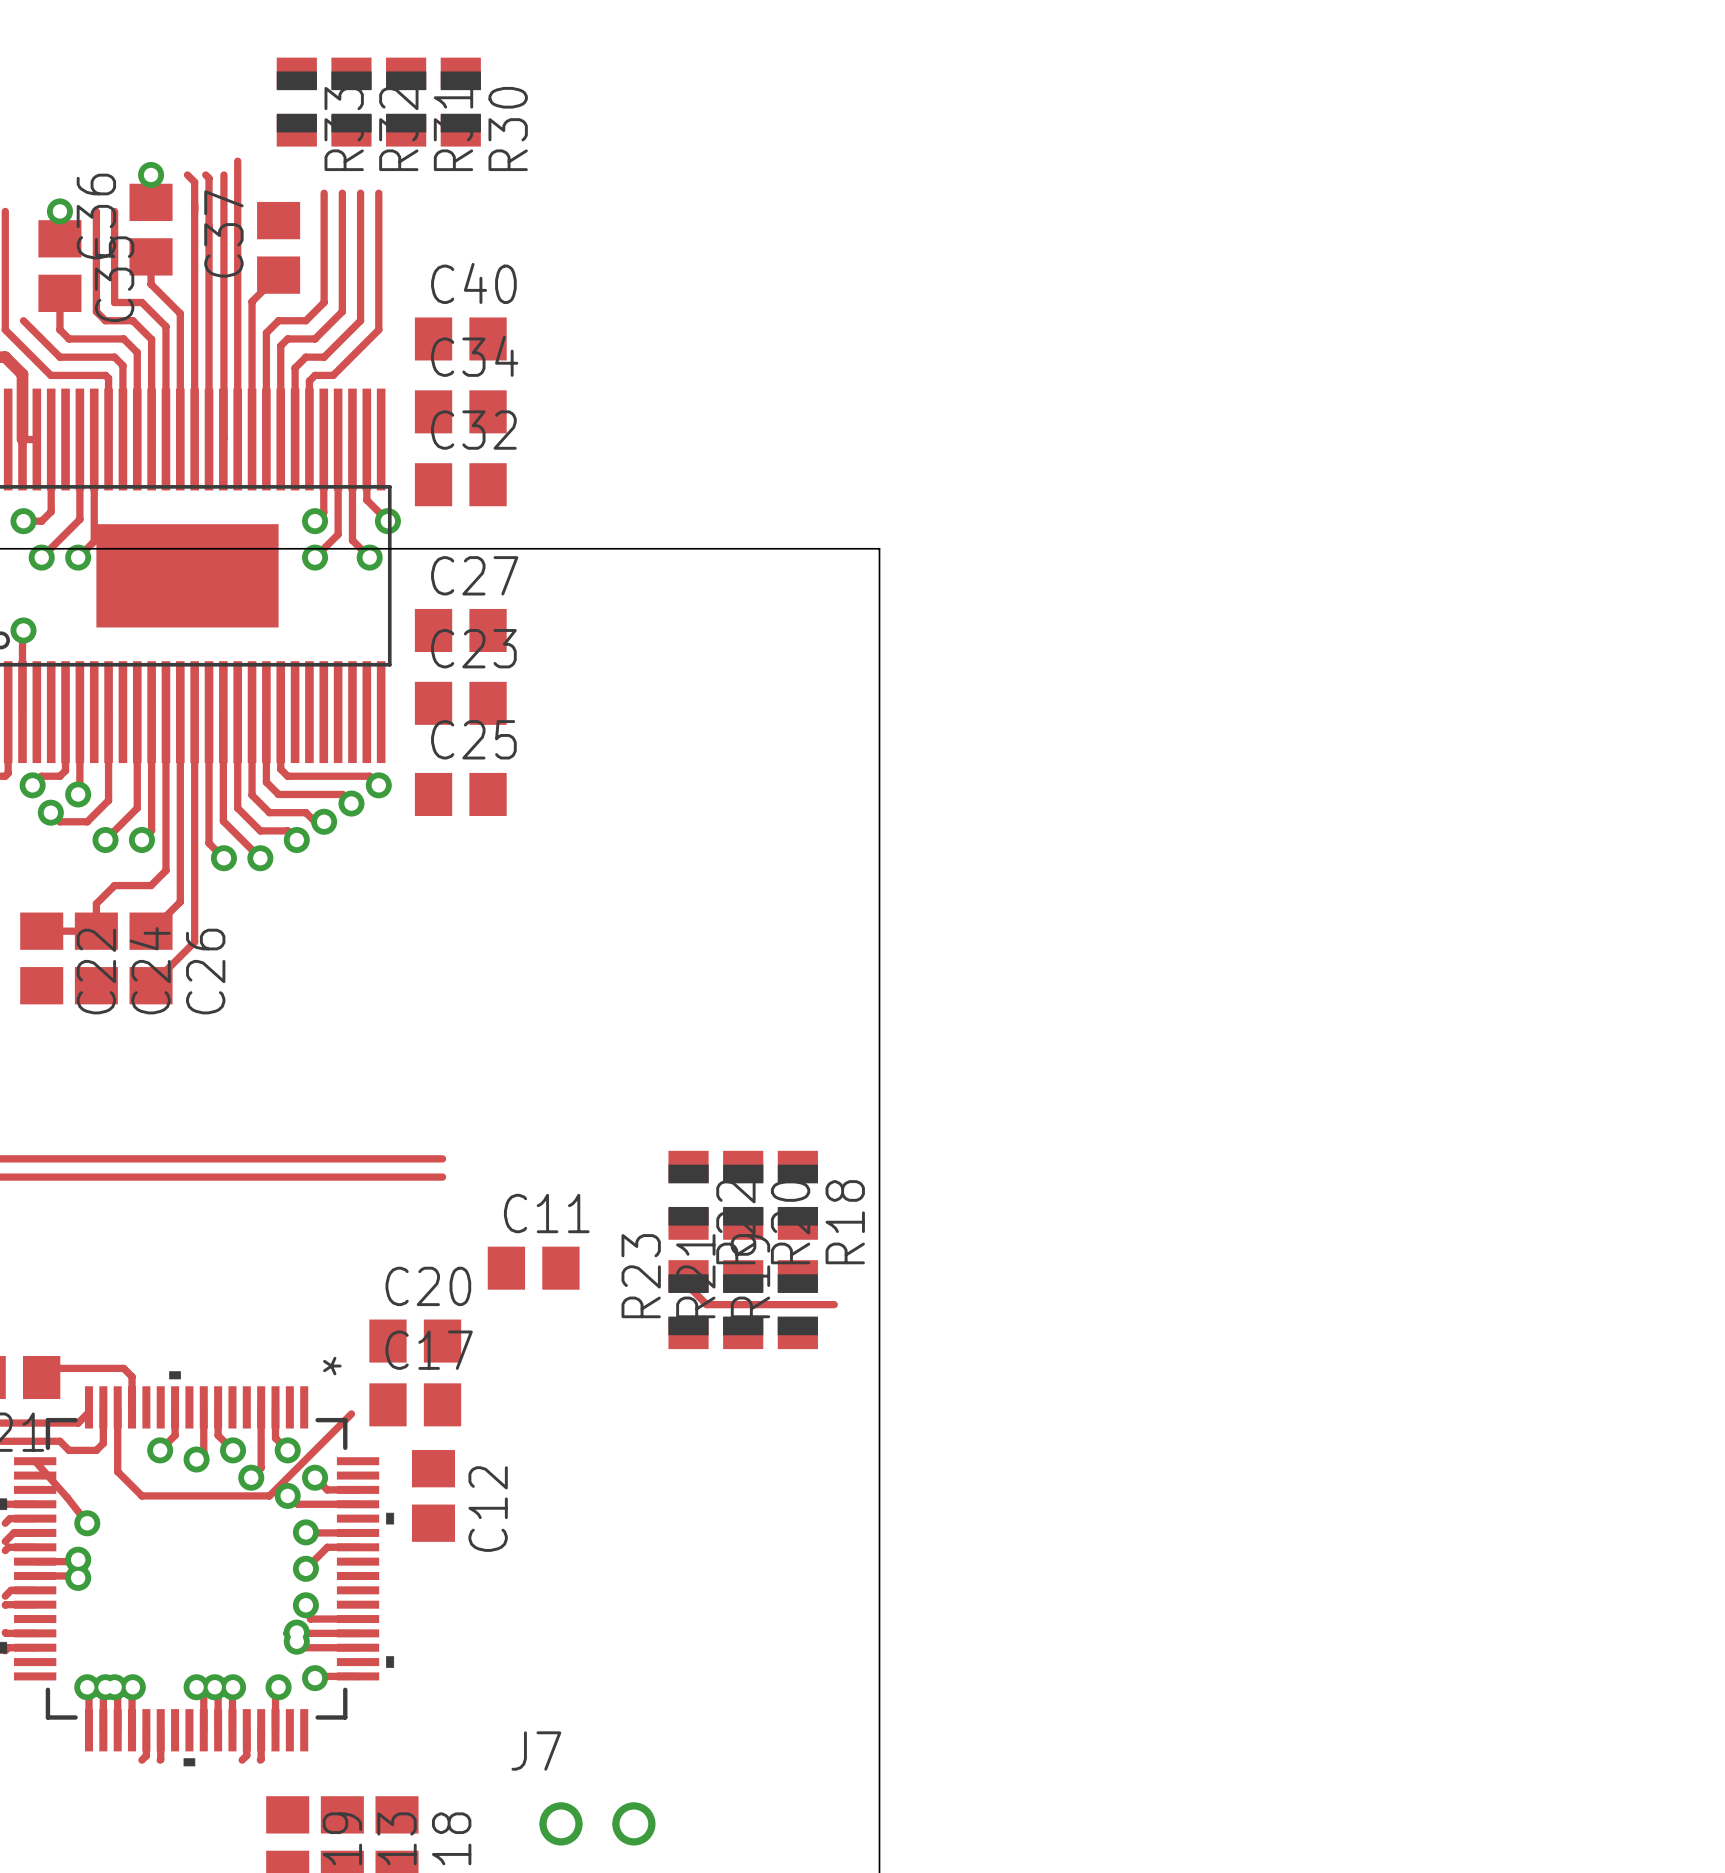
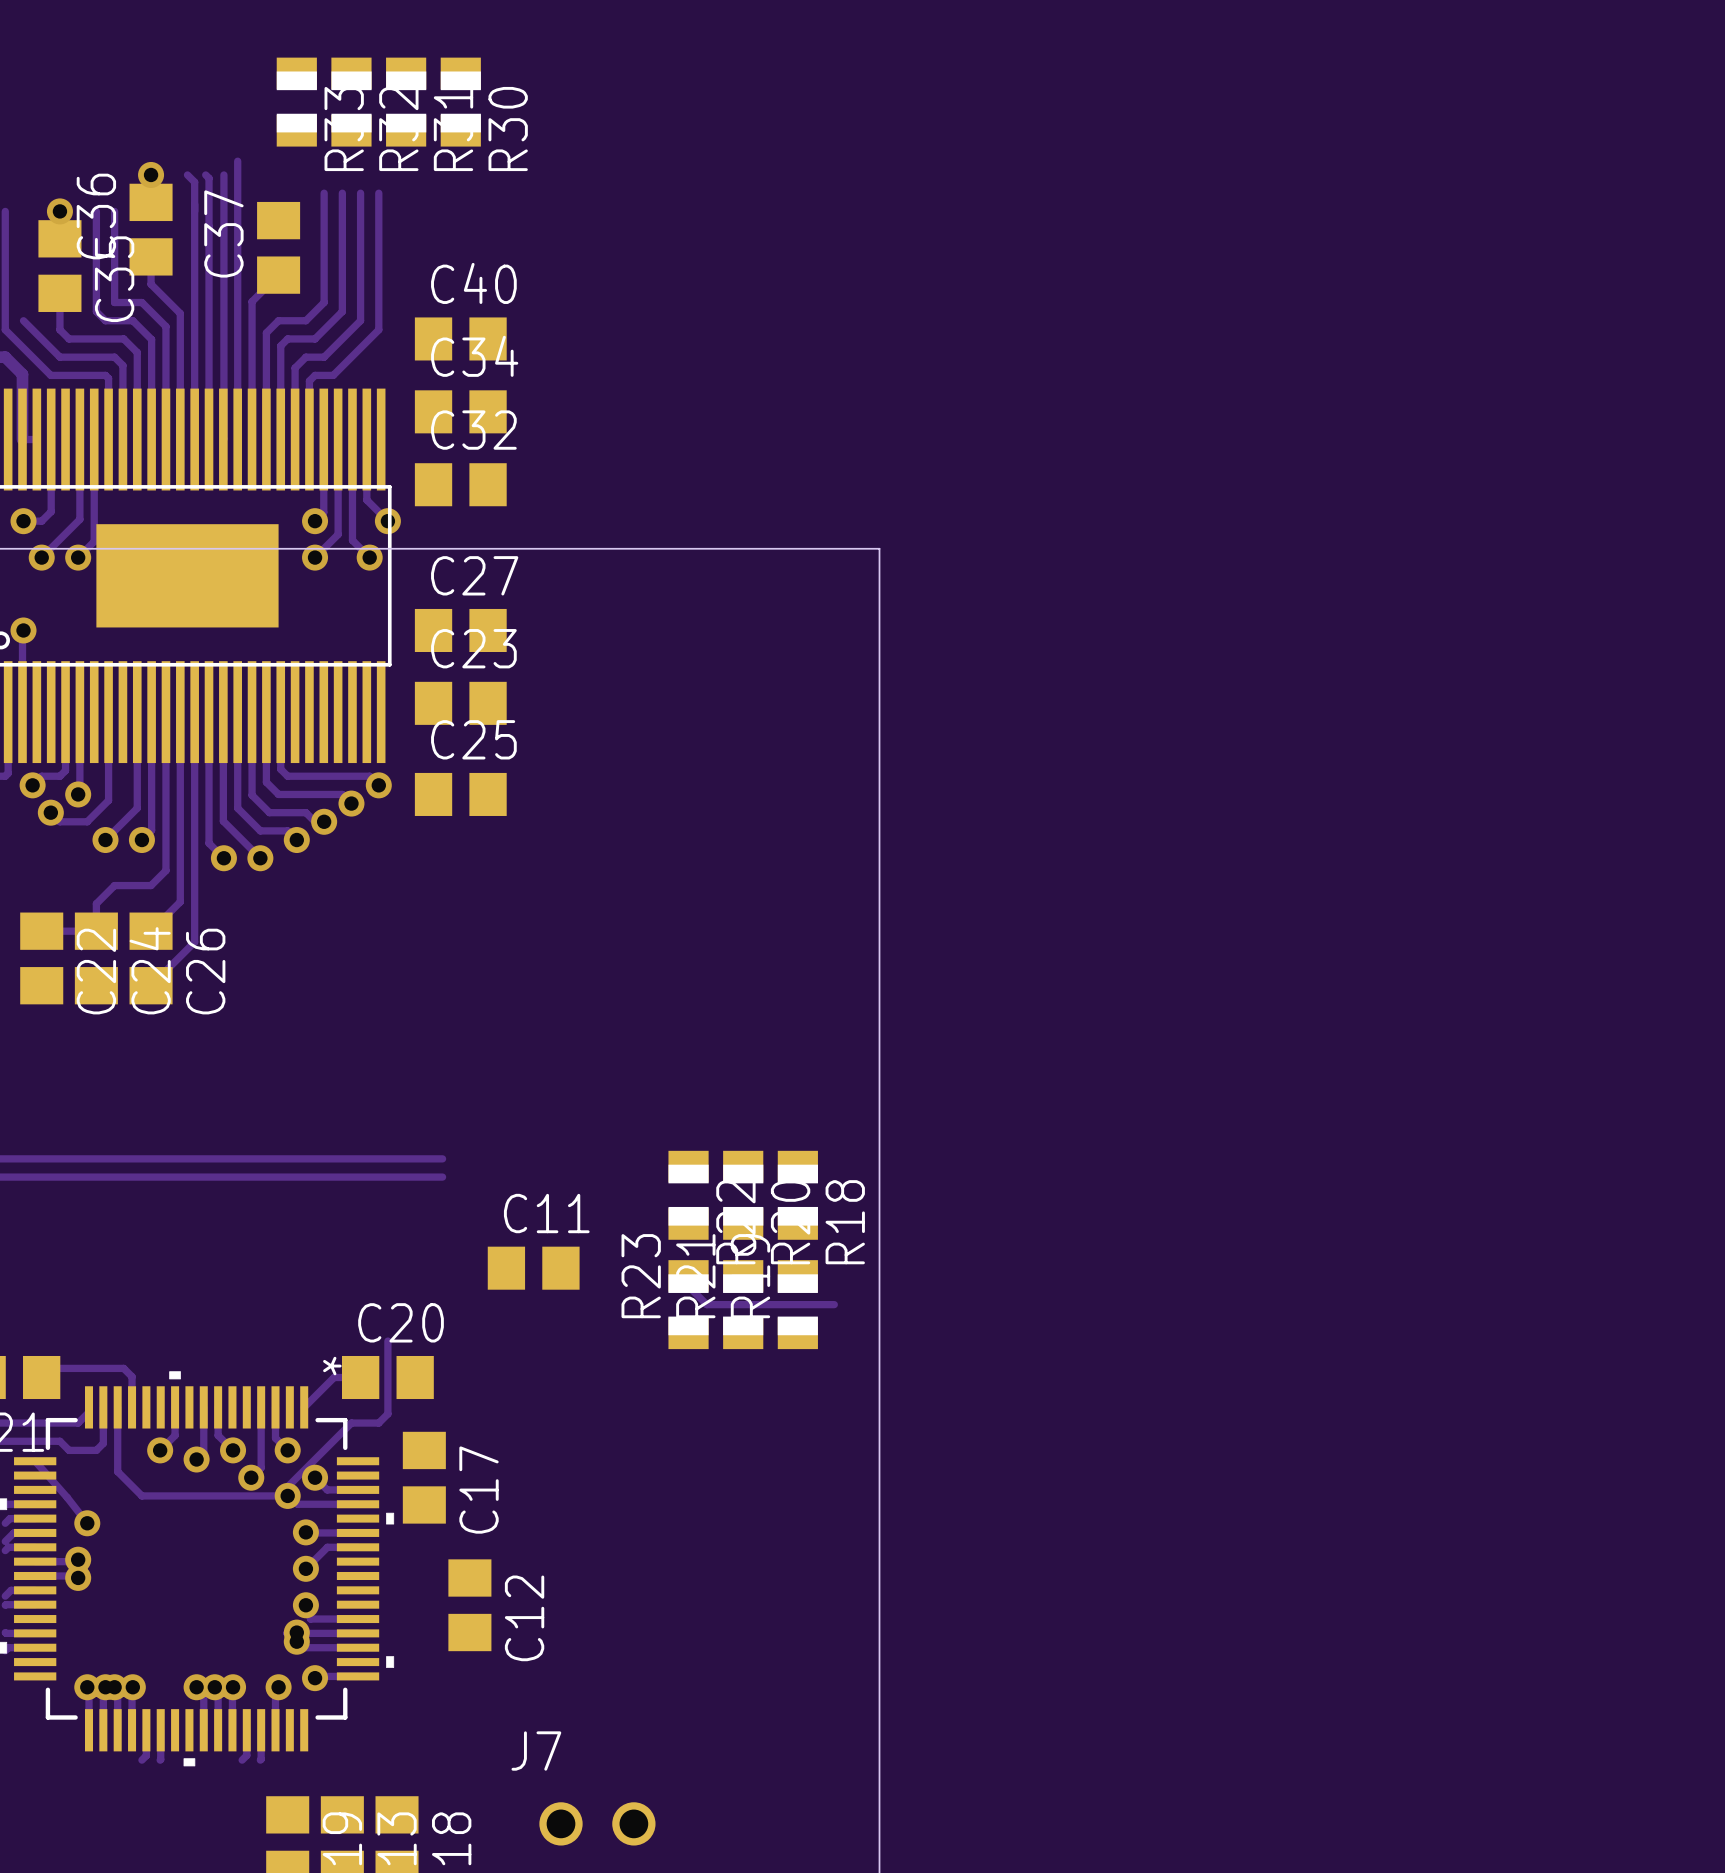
C20 position: (415, 1341) -> (387, 1377)
track: none -> (360, 1377) (334, 1377) (304, 1407)
C17 rotation: 0° (415, 1404) -> 90° clockwise (424, 1477)
C17 position: (415, 1404) -> (424, 1477)
track: (351, 1413) (269, 1495) -> (387, 1341) (387, 1413) (378, 1423) (351, 1423) (278, 1495) (269, 1495)
C12 position: (433, 1495) -> (469, 1605)

